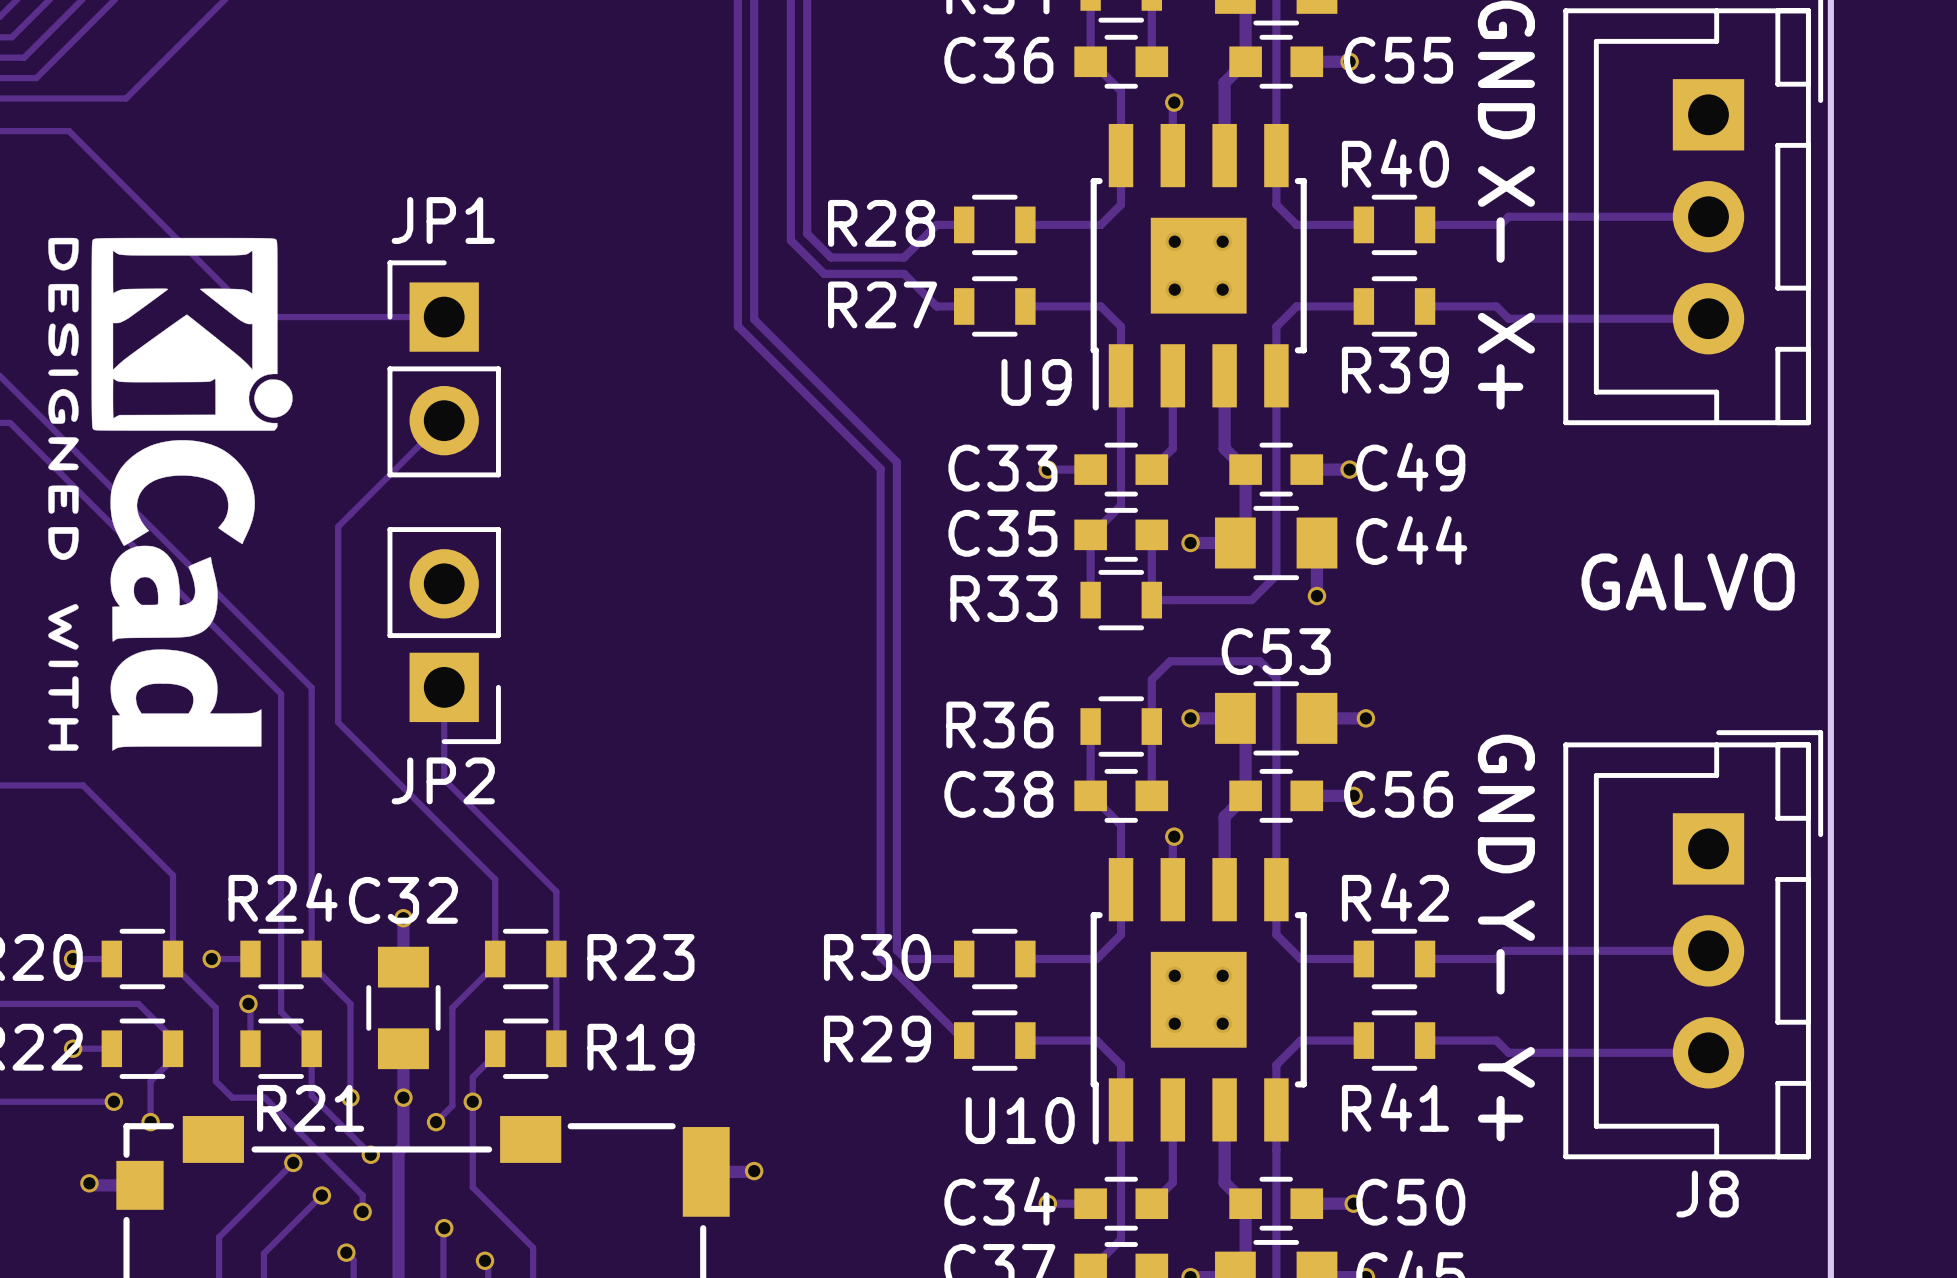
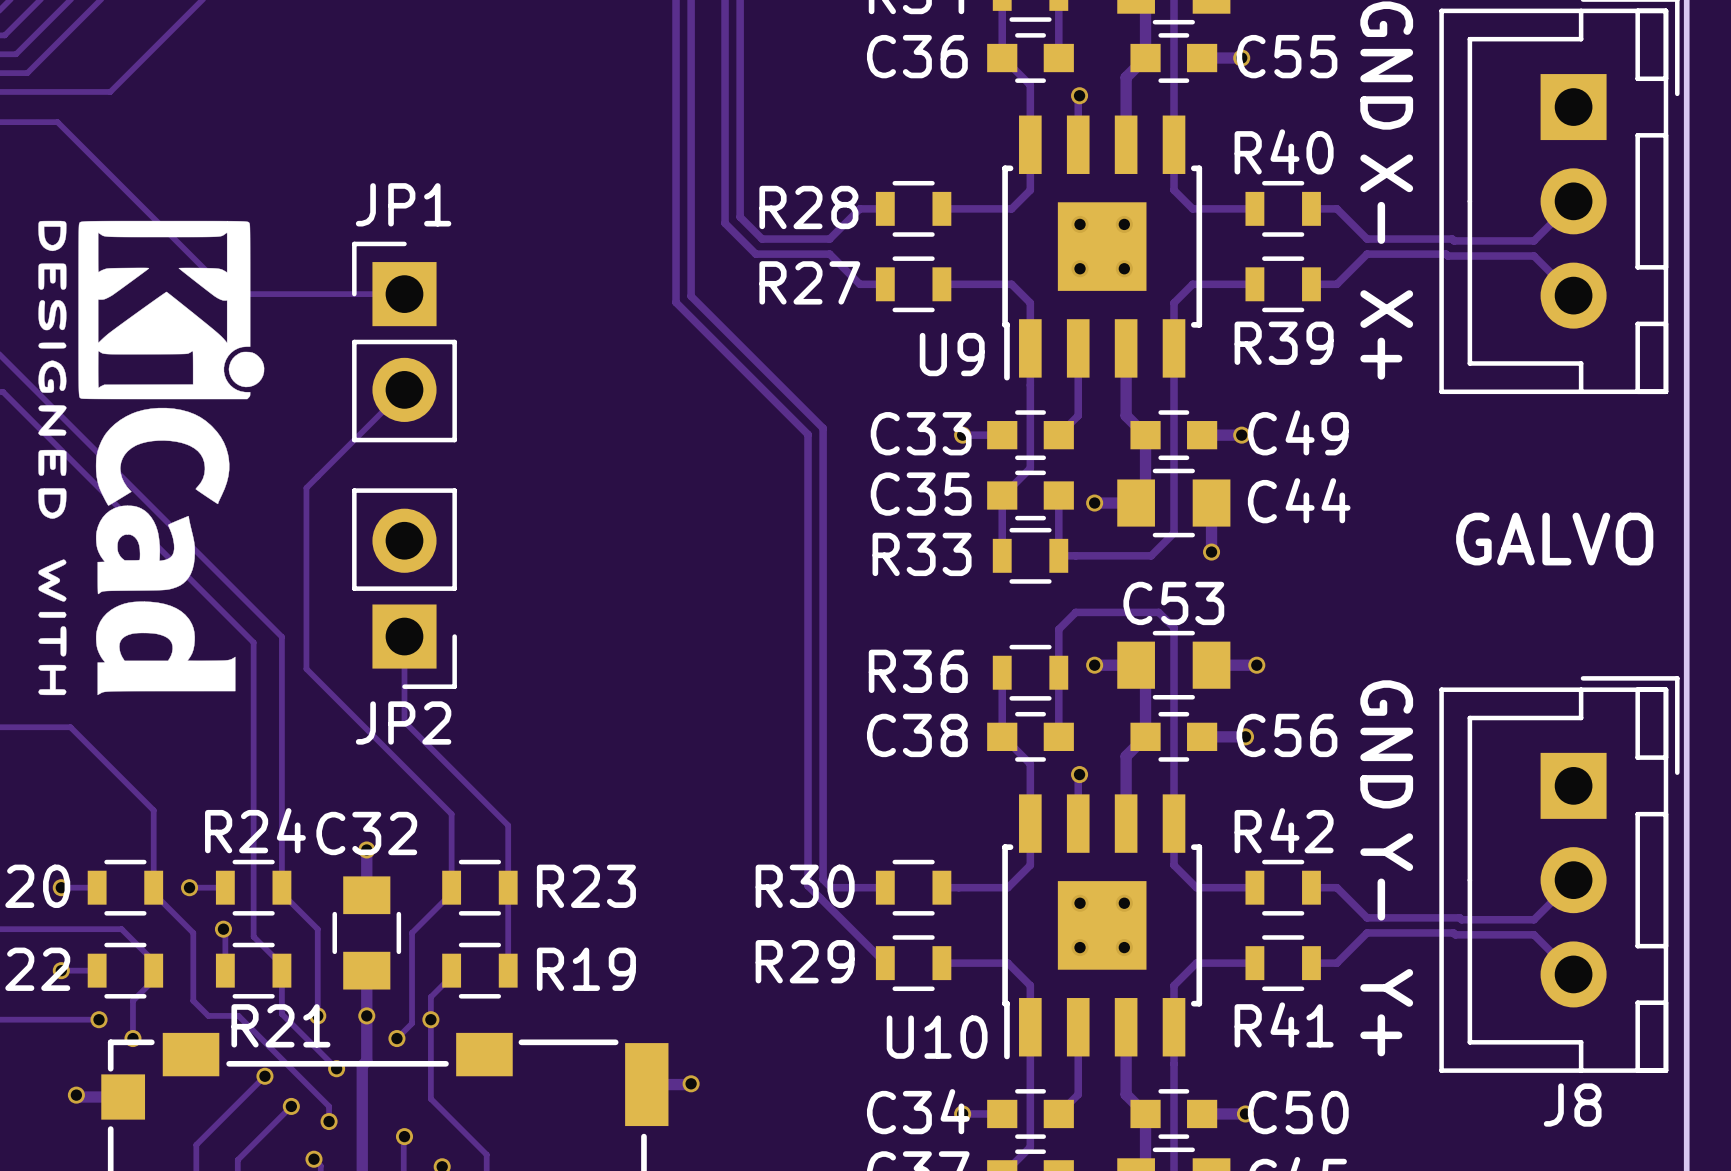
track: (1708, 216) (1508, 216) (1500, 224) (1452, 224) -> (1573, 201) (1533, 240) (1367, 239) (1336, 208)
track: (1452, 306) (1496, 306) (1508, 318) (1708, 318) -> (1336, 284) (1367, 254) (1533, 256) (1573, 295)
track: (1708, 950) (1504, 950) (1496, 959) (1452, 959) -> (1573, 880) (1533, 919) (1367, 917) (1336, 887)
track: (1452, 1040) (1496, 1040) (1508, 1052) (1708, 1052) -> (1336, 963) (1367, 932) (1533, 934) (1573, 974)

